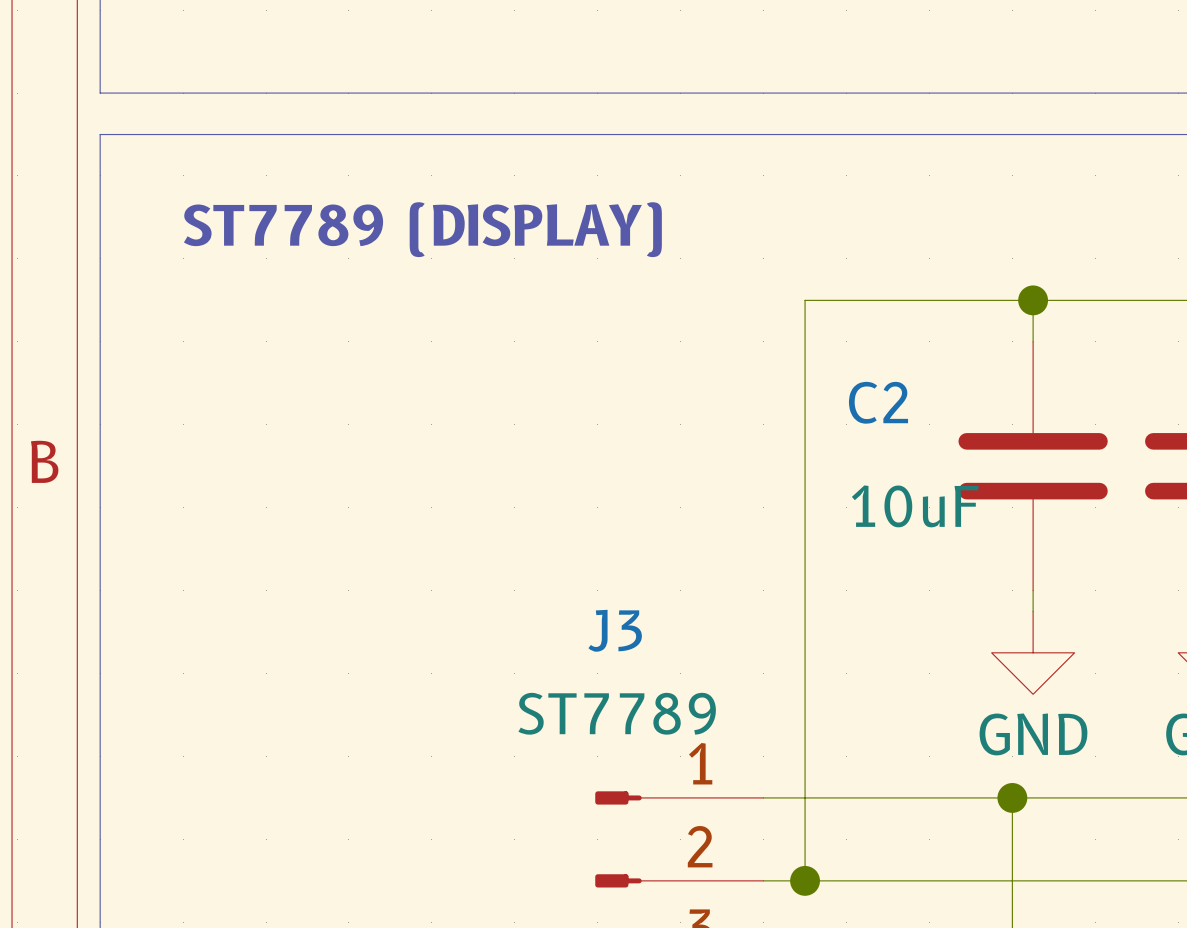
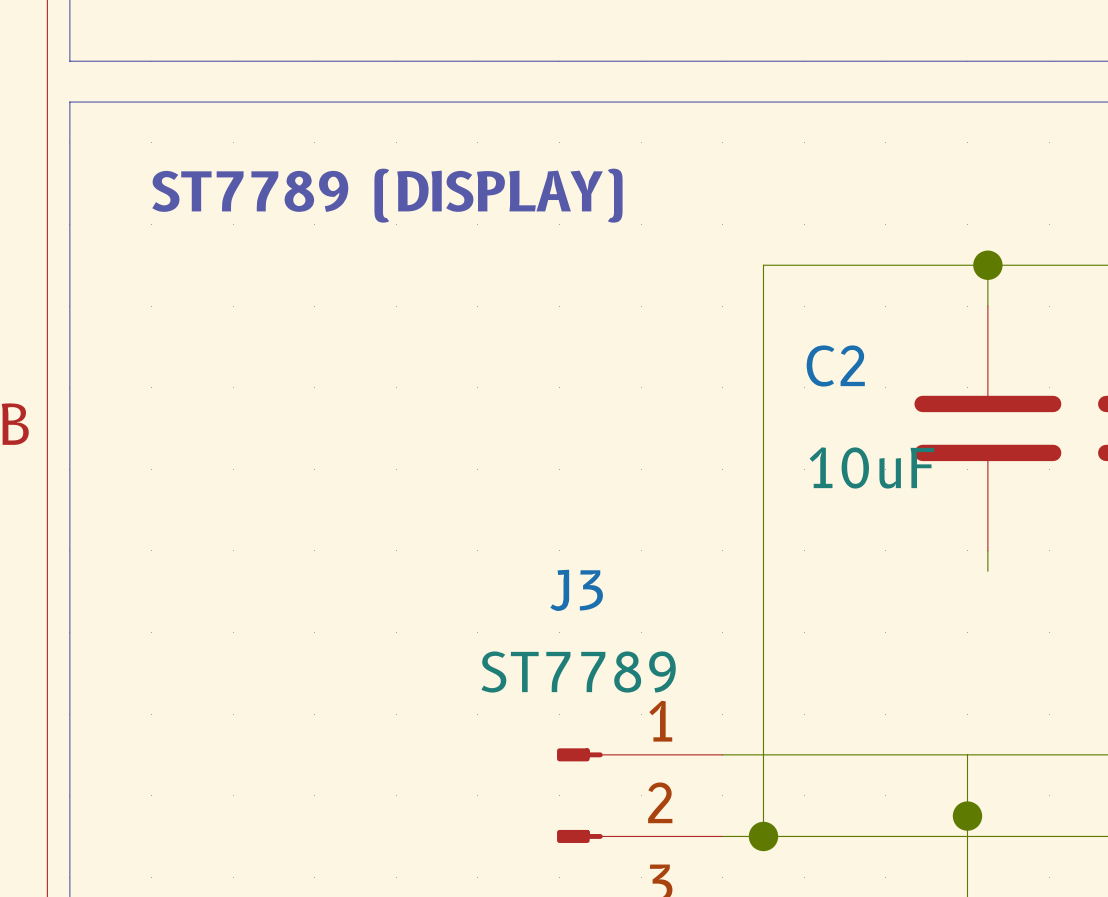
power symbol: GND (1033, 652) -> none
junction position: (1012, 797) -> (967, 816)

